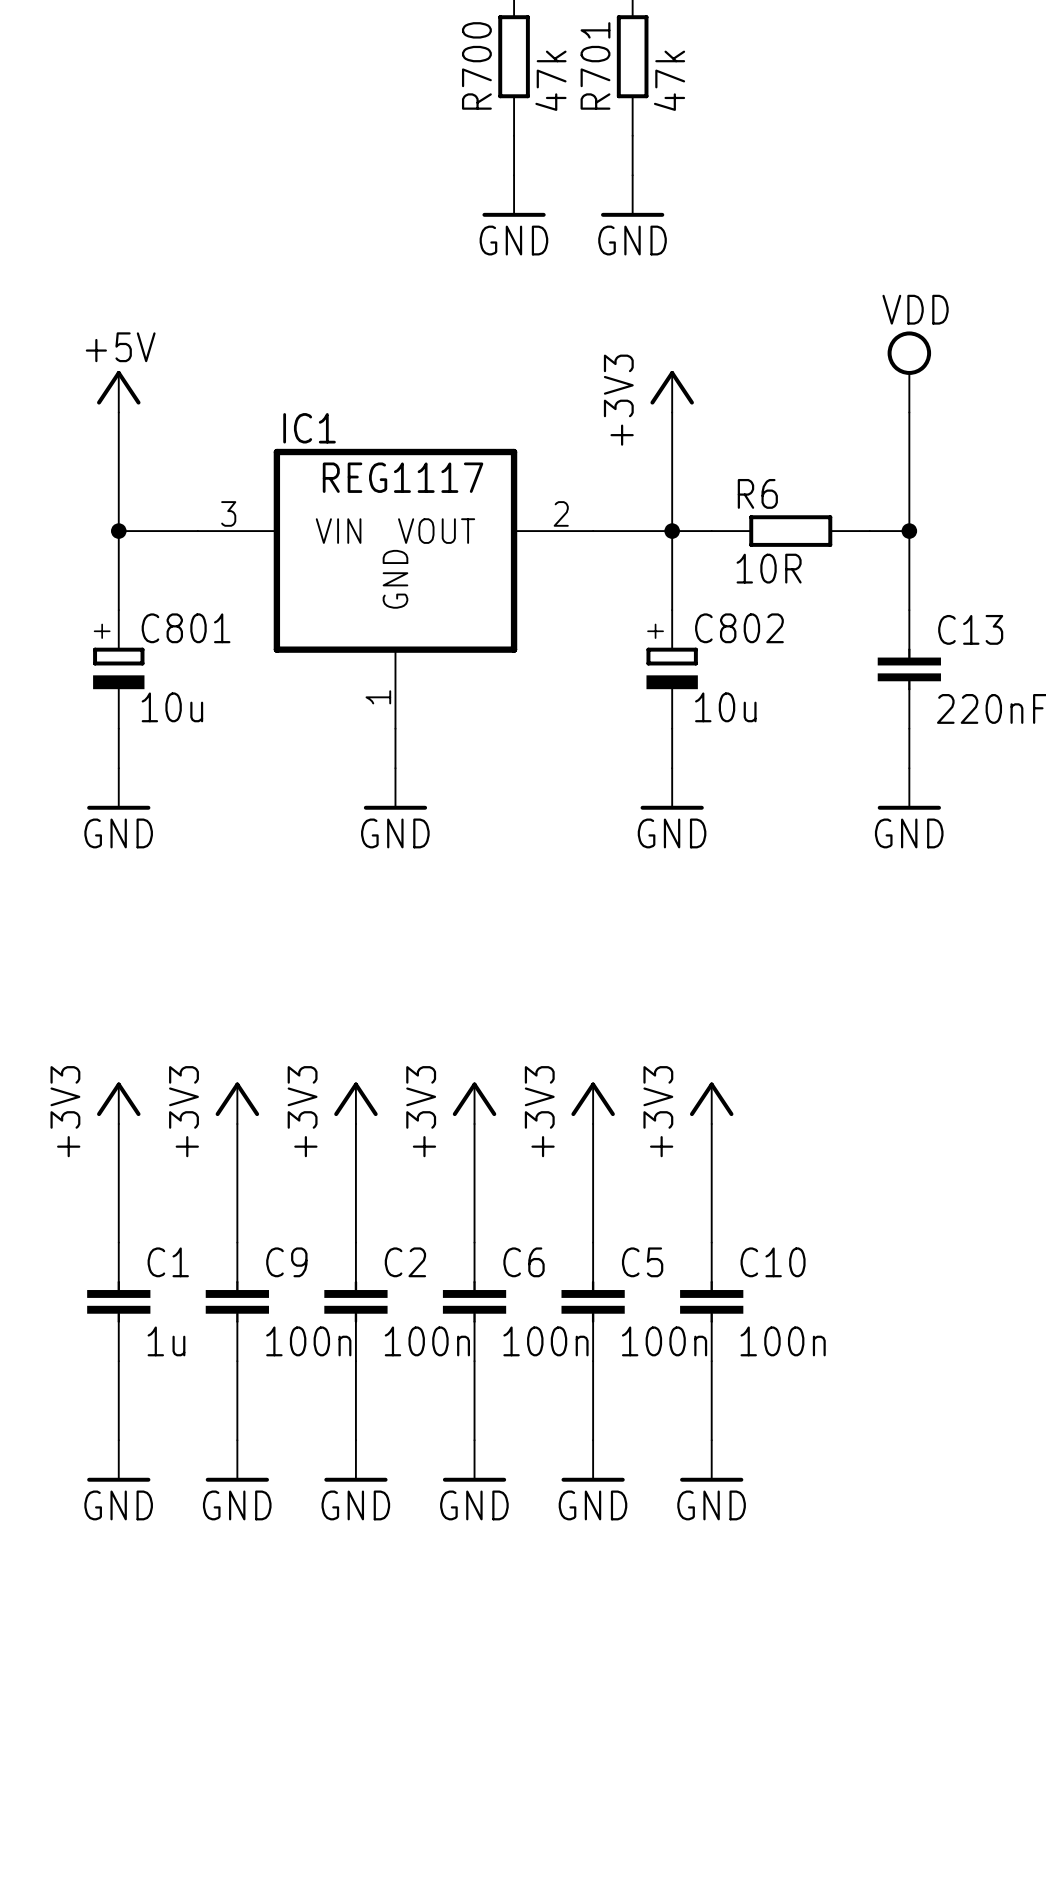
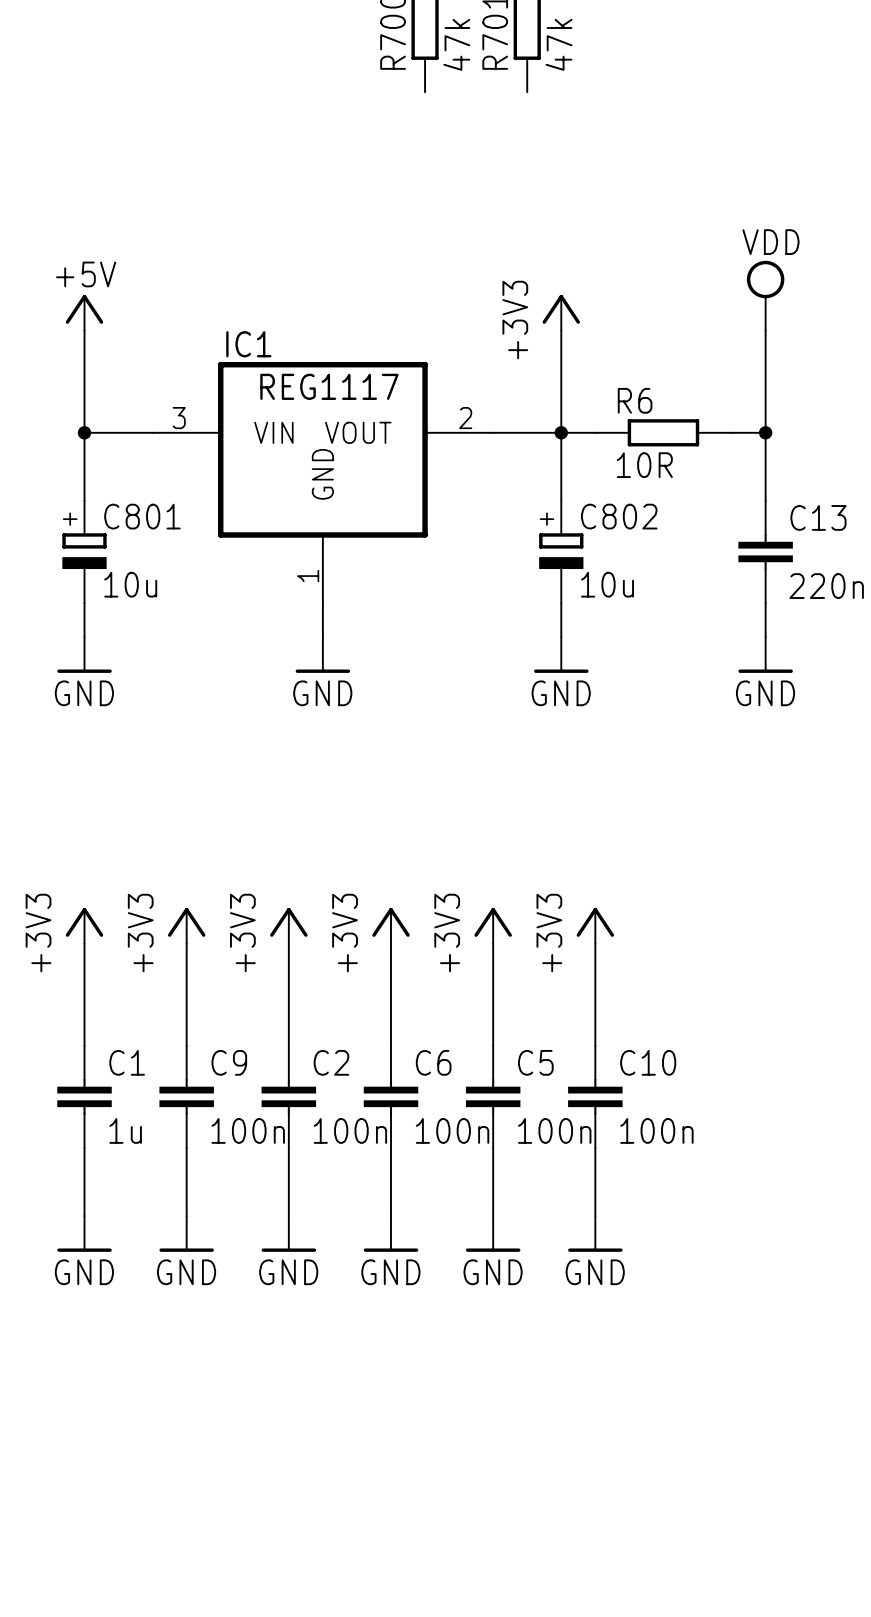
wire: (514, 135) (514, 175) -> none
wire: (632, 135) (632, 175) -> none
power symbol: GND (514, 196) -> none
power symbol: GND (632, 196) -> none

